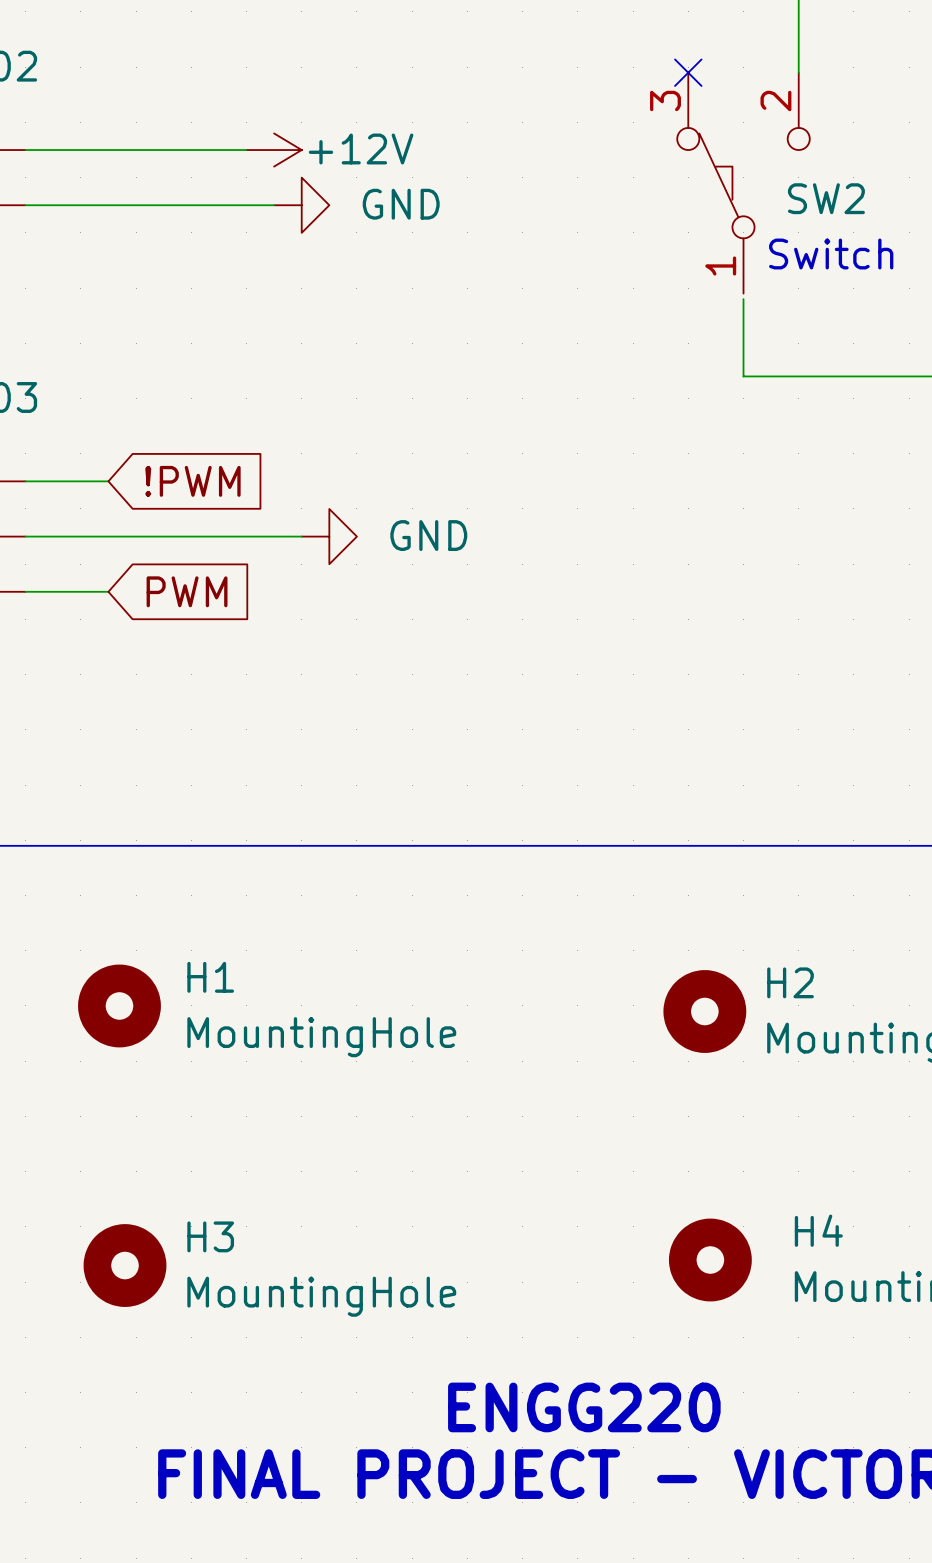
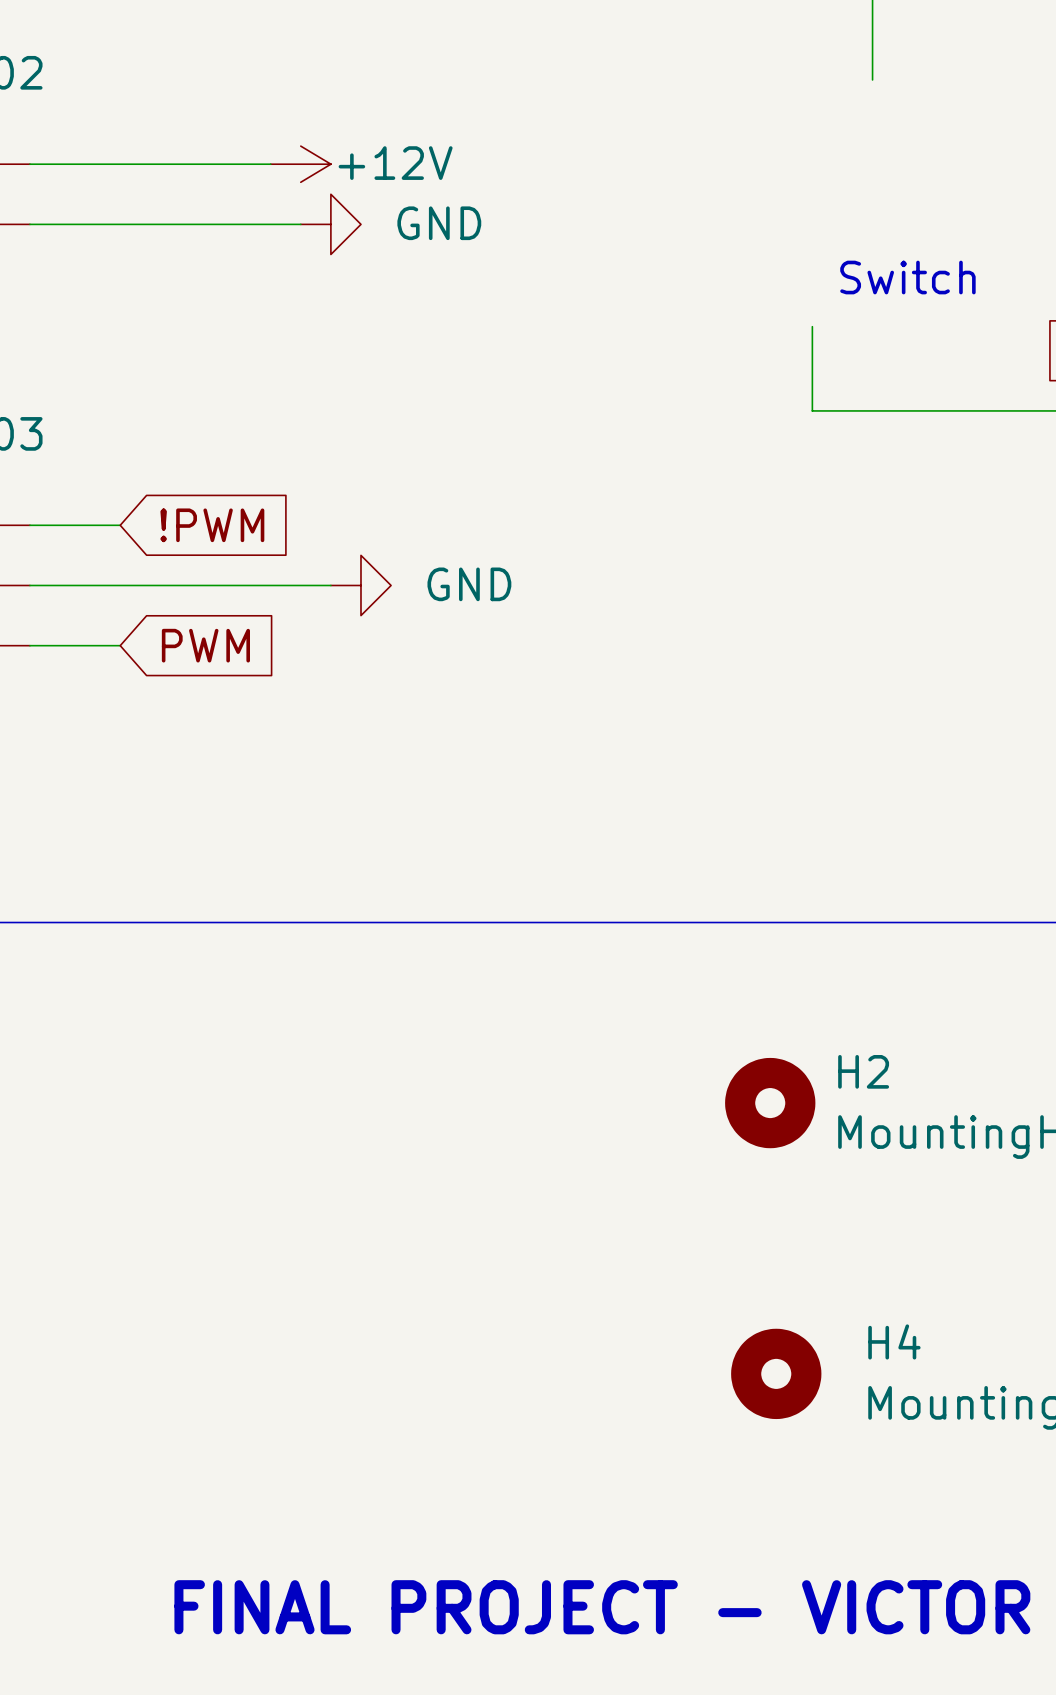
no-connect mark: (688, 72) -> none
SW2: (743, 183) -> none
H1: MountingHole (119, 1005) -> none
H3: MountingHole (125, 1265) -> none
text: ENGG220 (584, 1407) -> none

